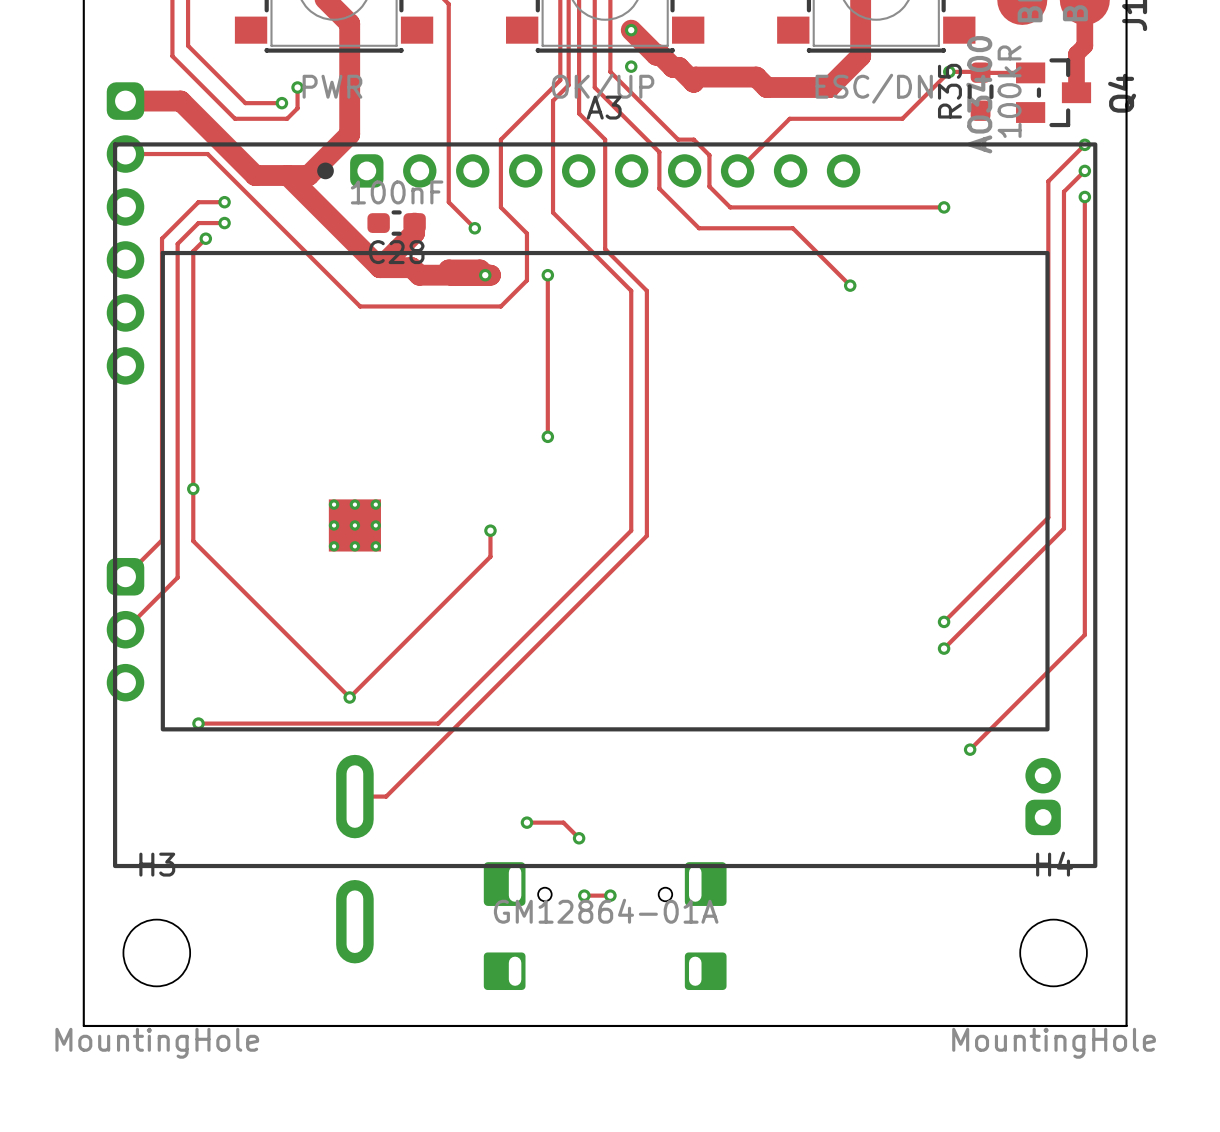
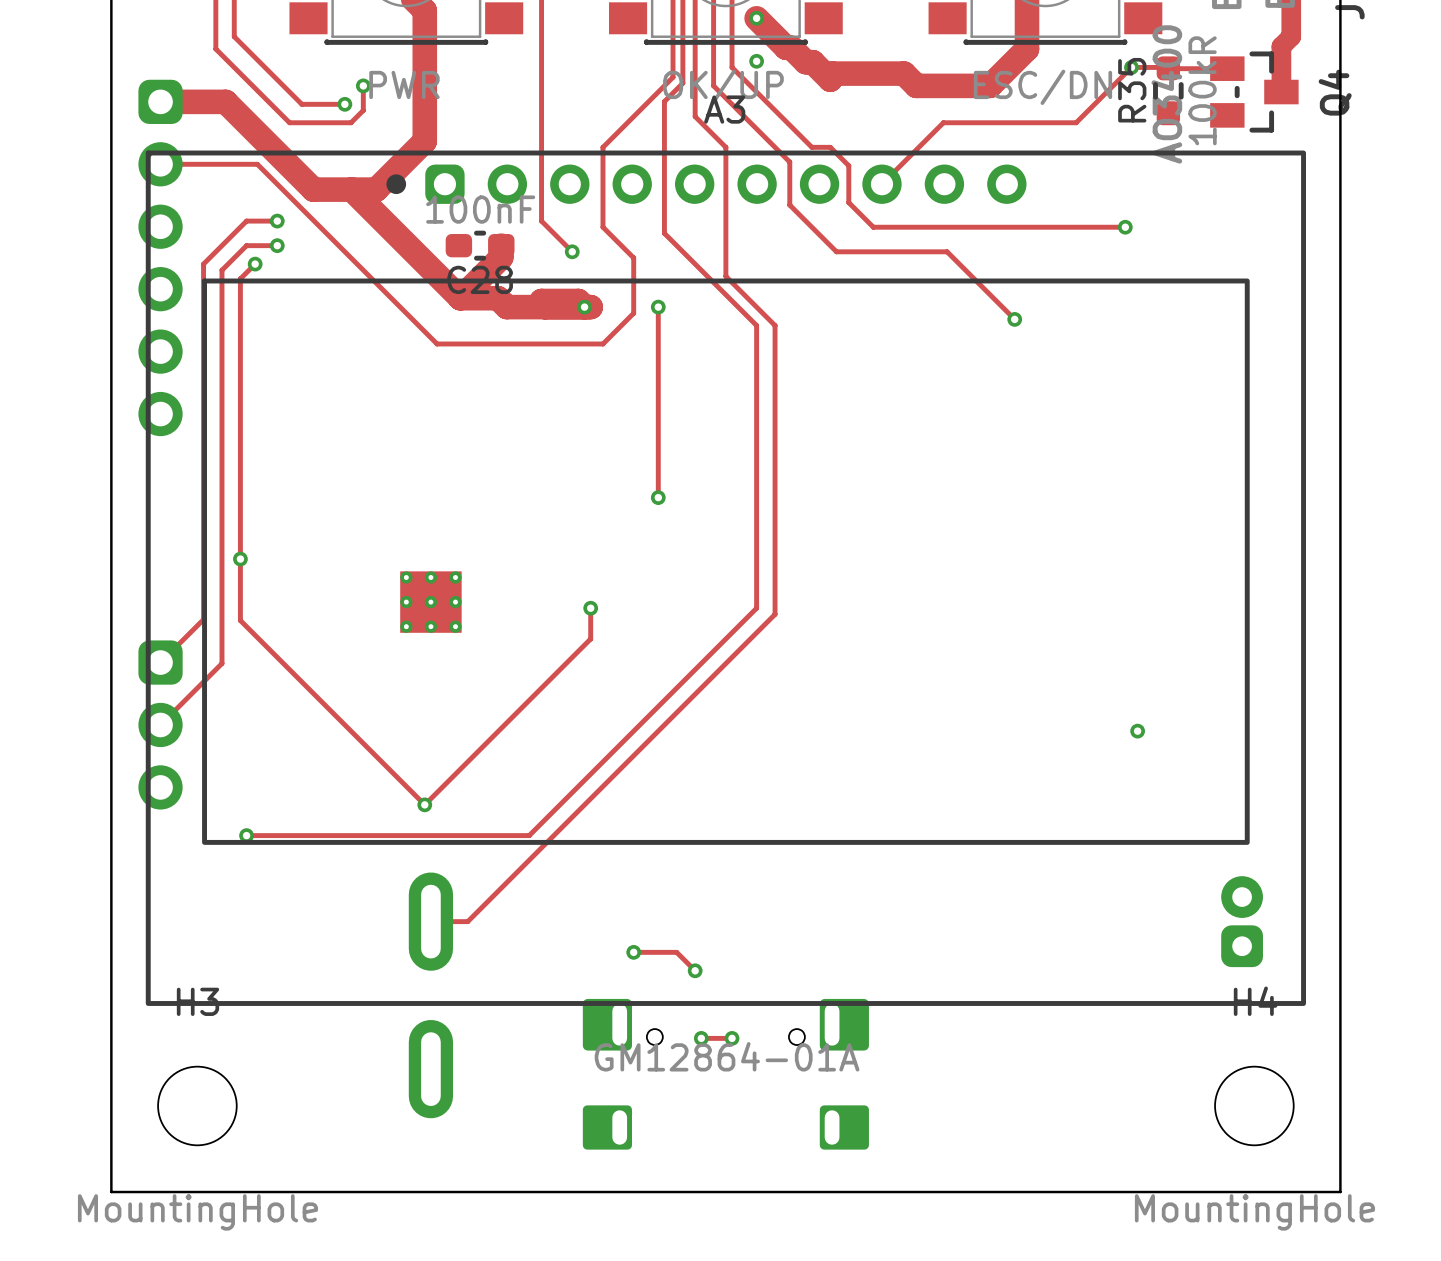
track: (1084, 144) (1048, 181) (1048, 517) (944, 621) -> none
via: (1084, 144) -> none
track: (1084, 170) (1063, 191) (1063, 528) (944, 648) -> none
via: (1084, 170) -> none
track: (1084, 196) (1084, 634) (970, 749) -> none
via: (1084, 196) -> none
via: (944, 621) -> none
via: none -> (1137, 731)
via: (944, 648) -> none
via: (970, 749) -> none

